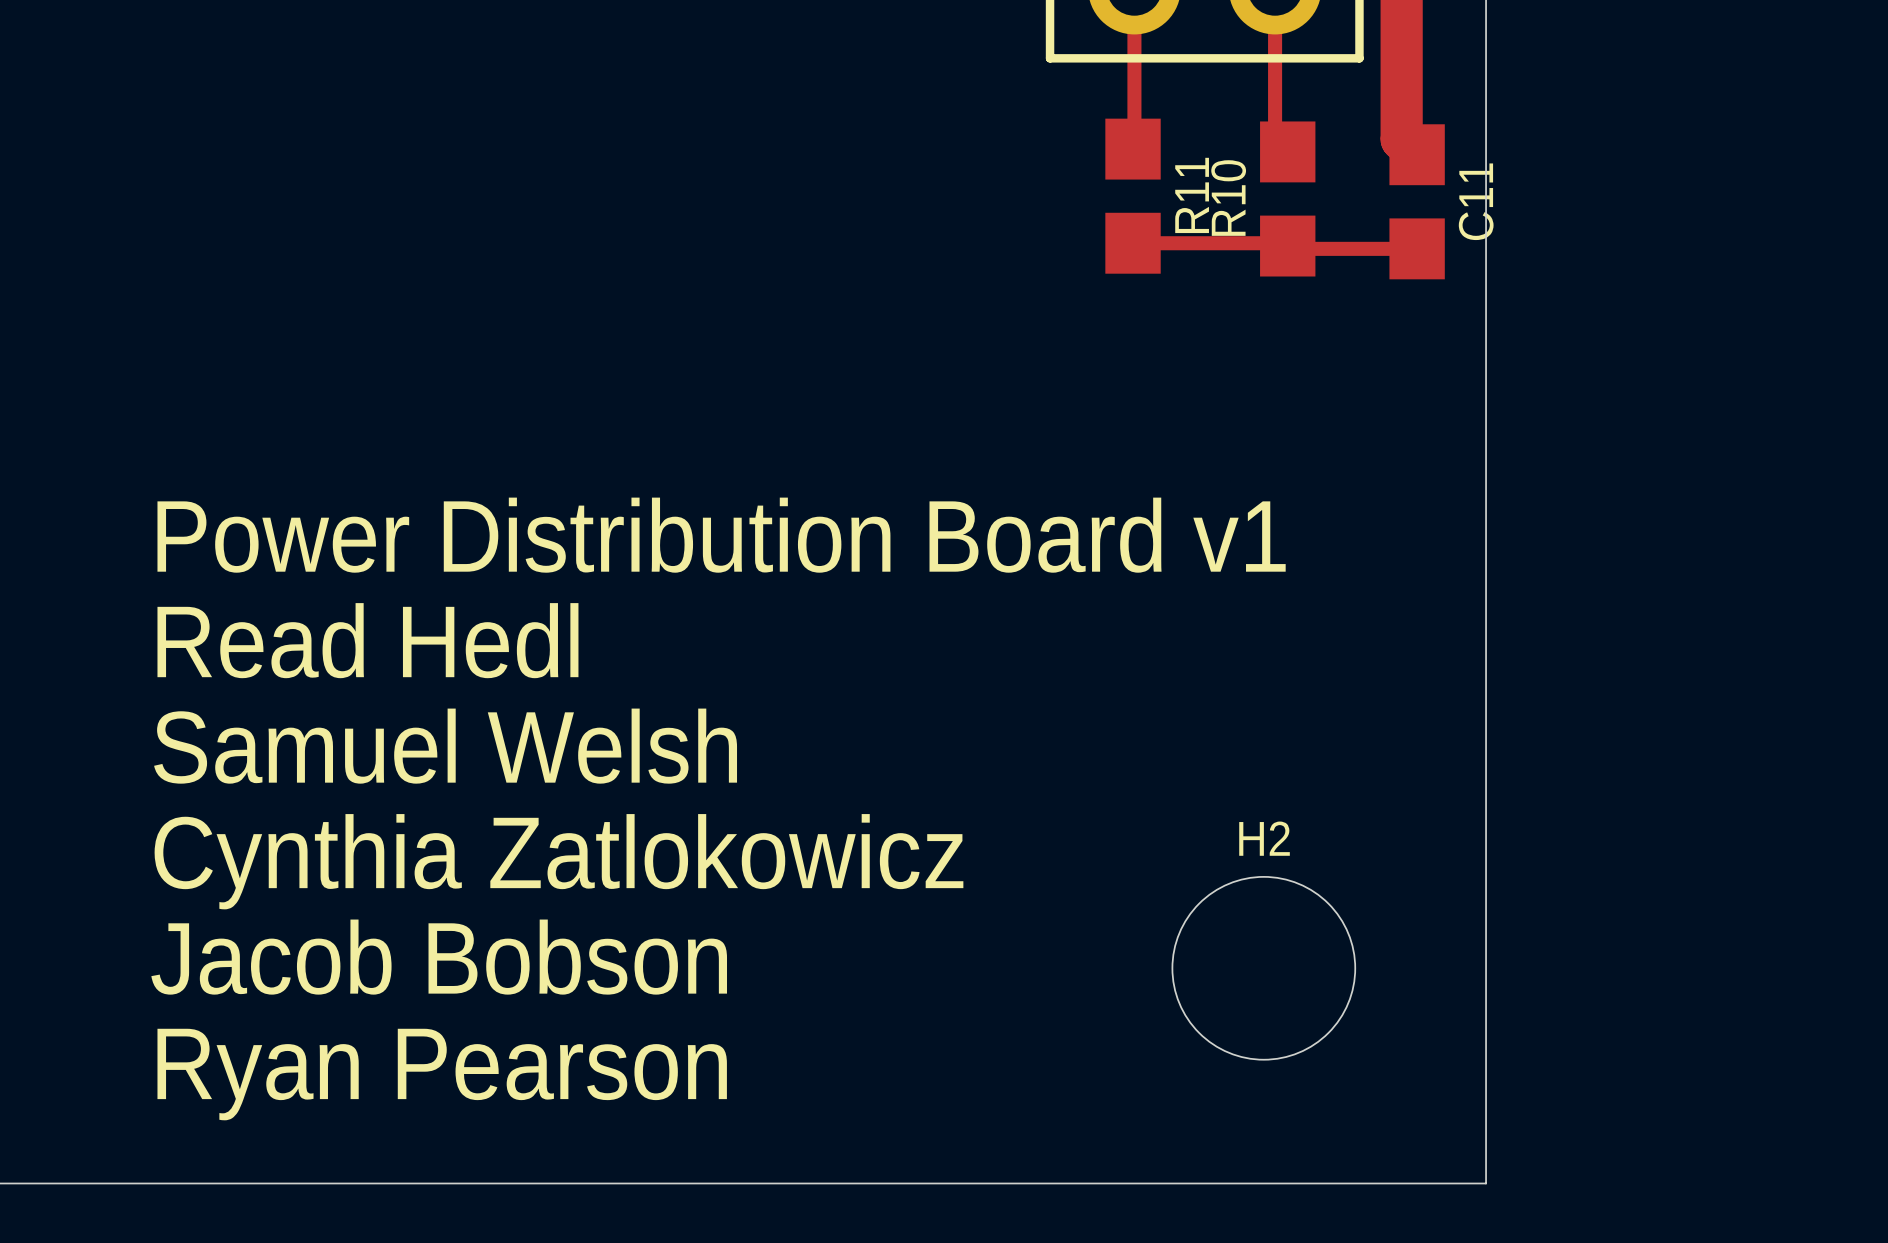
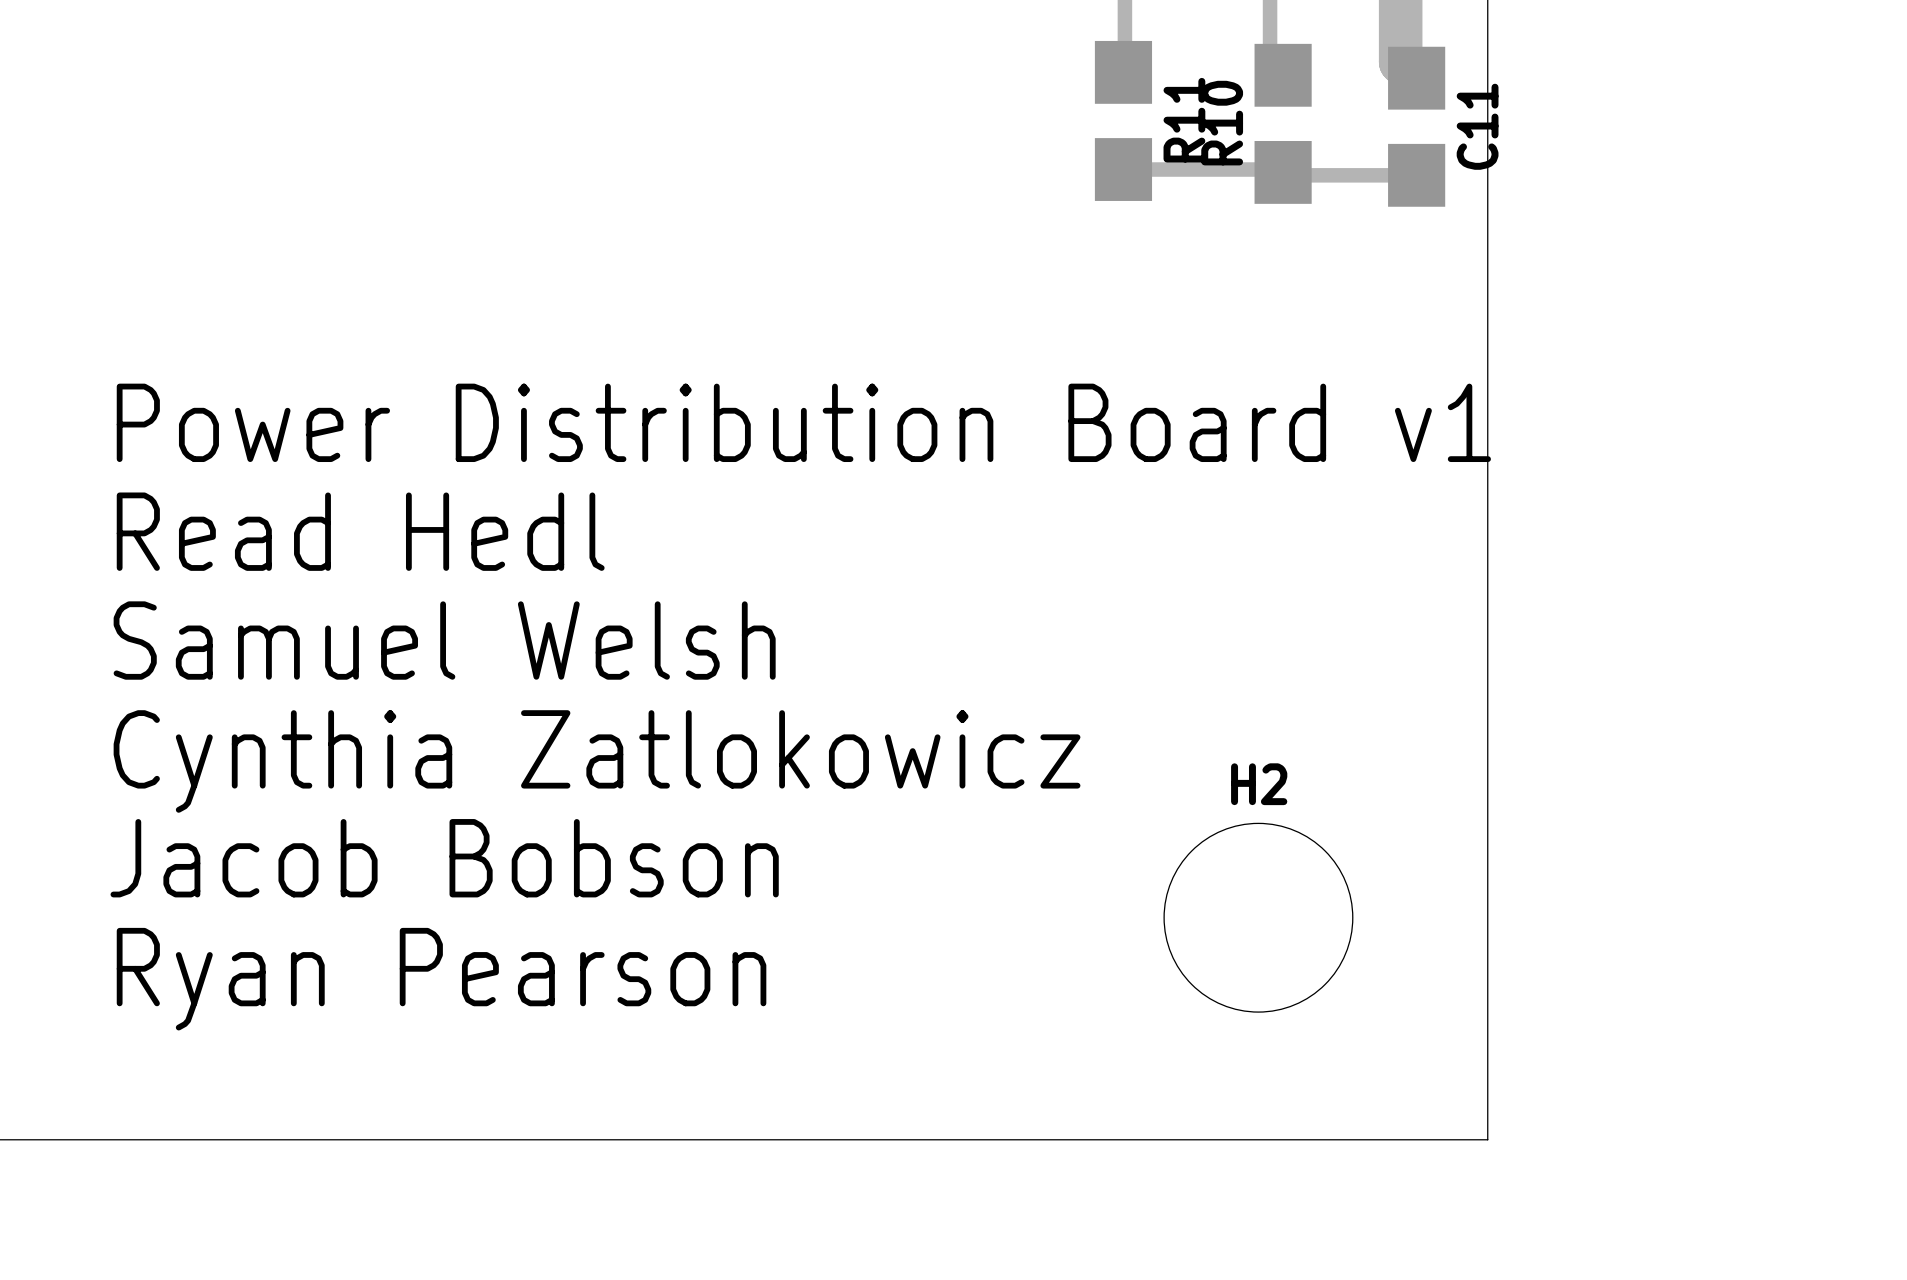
text position: Power Distribution Board v1 (721, 535) -> Power Distribution Board v1 (803, 422)
text position: Read Hedl (367, 640) -> Read Hedl (360, 531)
text position: Samuel Welsh (445, 746) -> Samuel Welsh (444, 640)
text position: Cynthia Zatlokowicz (558, 861) -> Cynthia Zatlokowicz (597, 761)
text position: Jacob Bobson (439, 957) -> Jacob Bobson (444, 858)
text position: Ryan Pearson (442, 1074) -> Ryan Pearson (441, 979)

